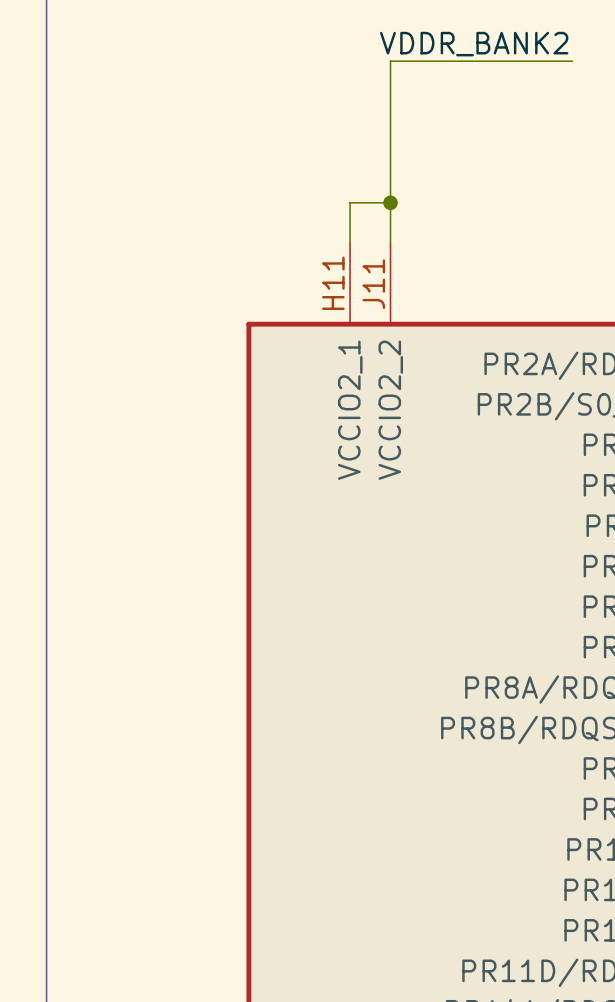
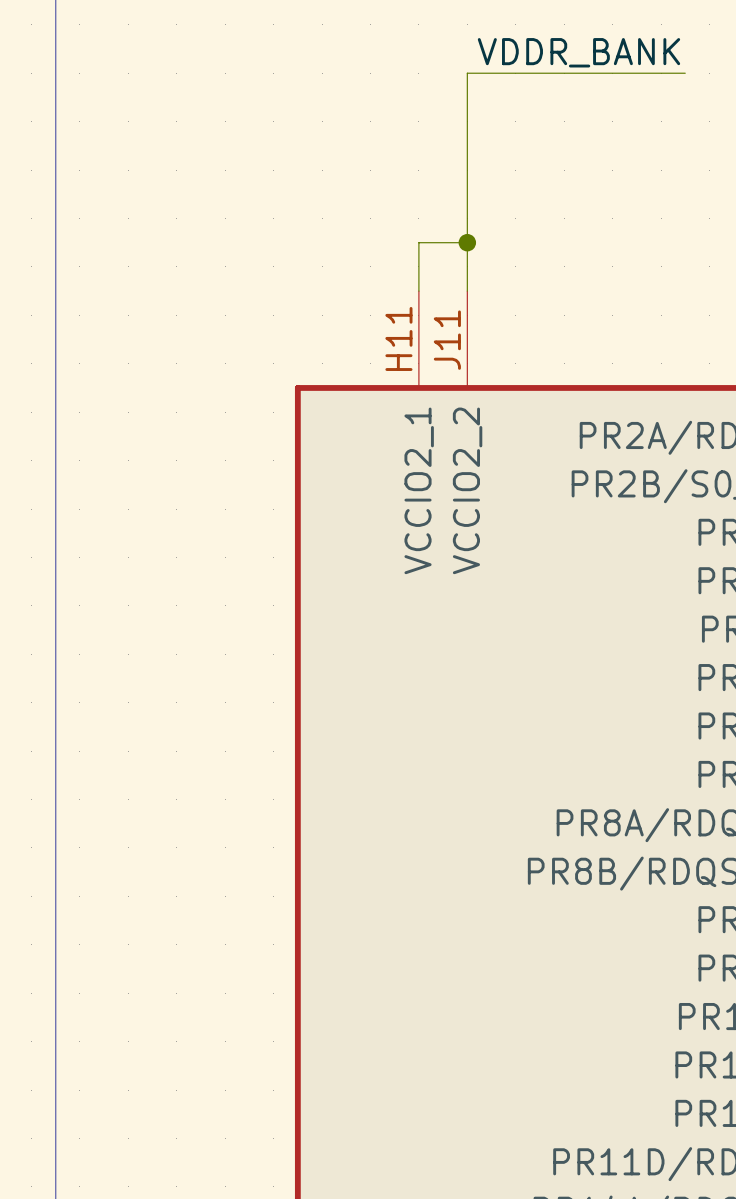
label: VDDR_BANK2 (474, 44) -> VDDR_BANK (578, 52)

